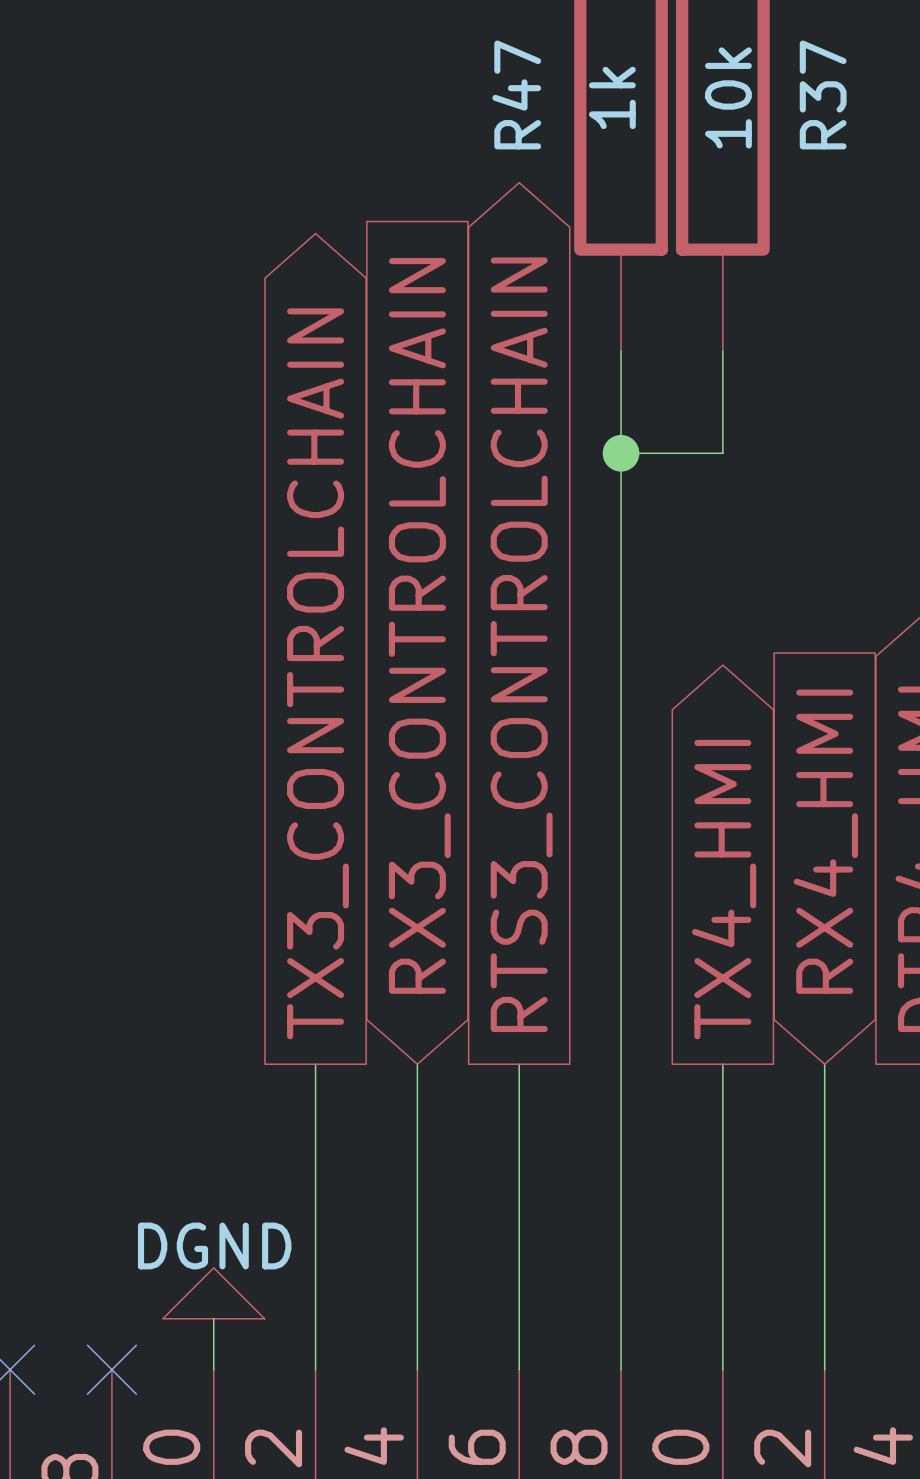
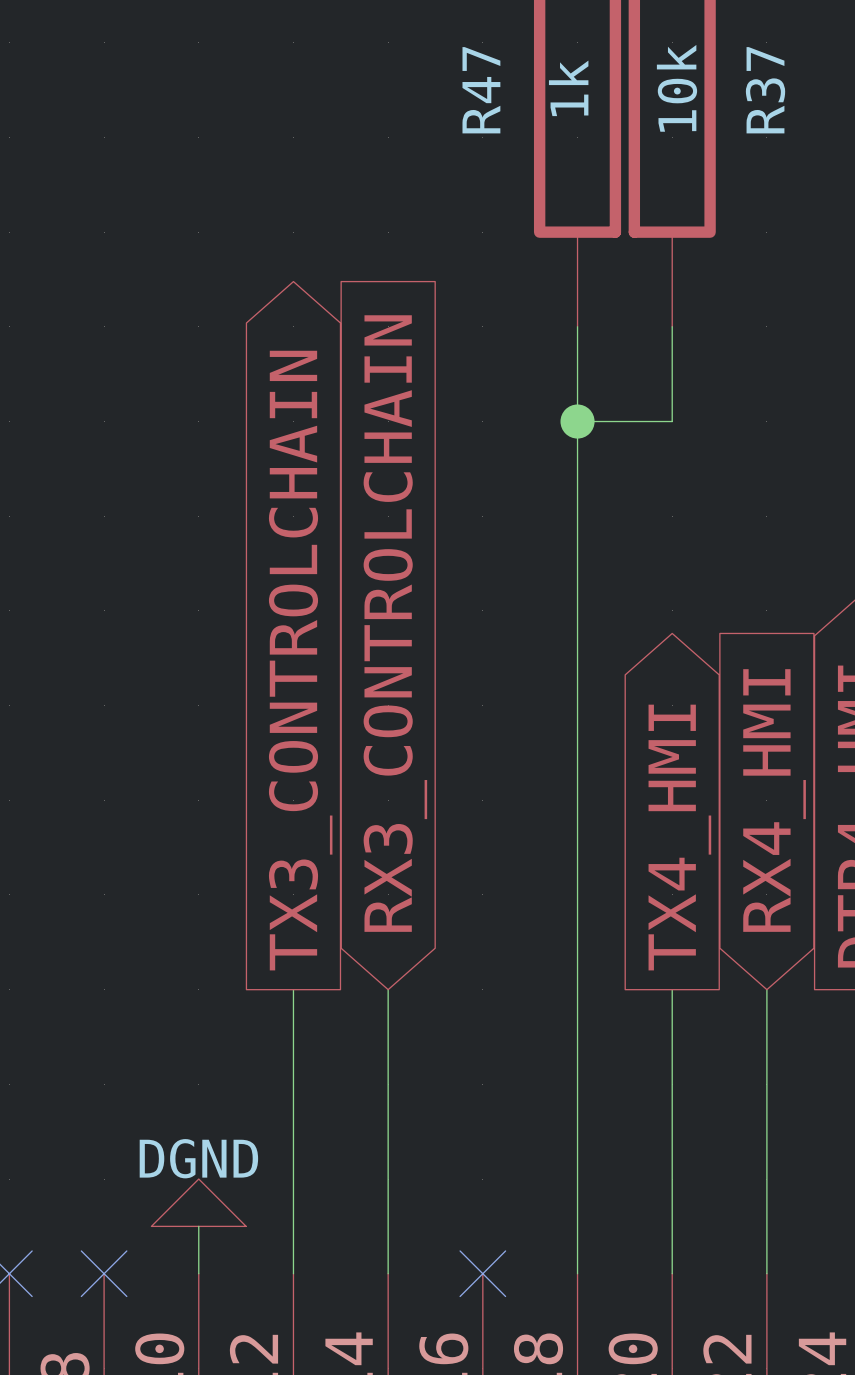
global label: RTS3_CONTROLCHAIN (521, 644) -> none
wire: (519, 1064) (519, 1369) -> none
no-connect mark: none -> (482, 1273)

